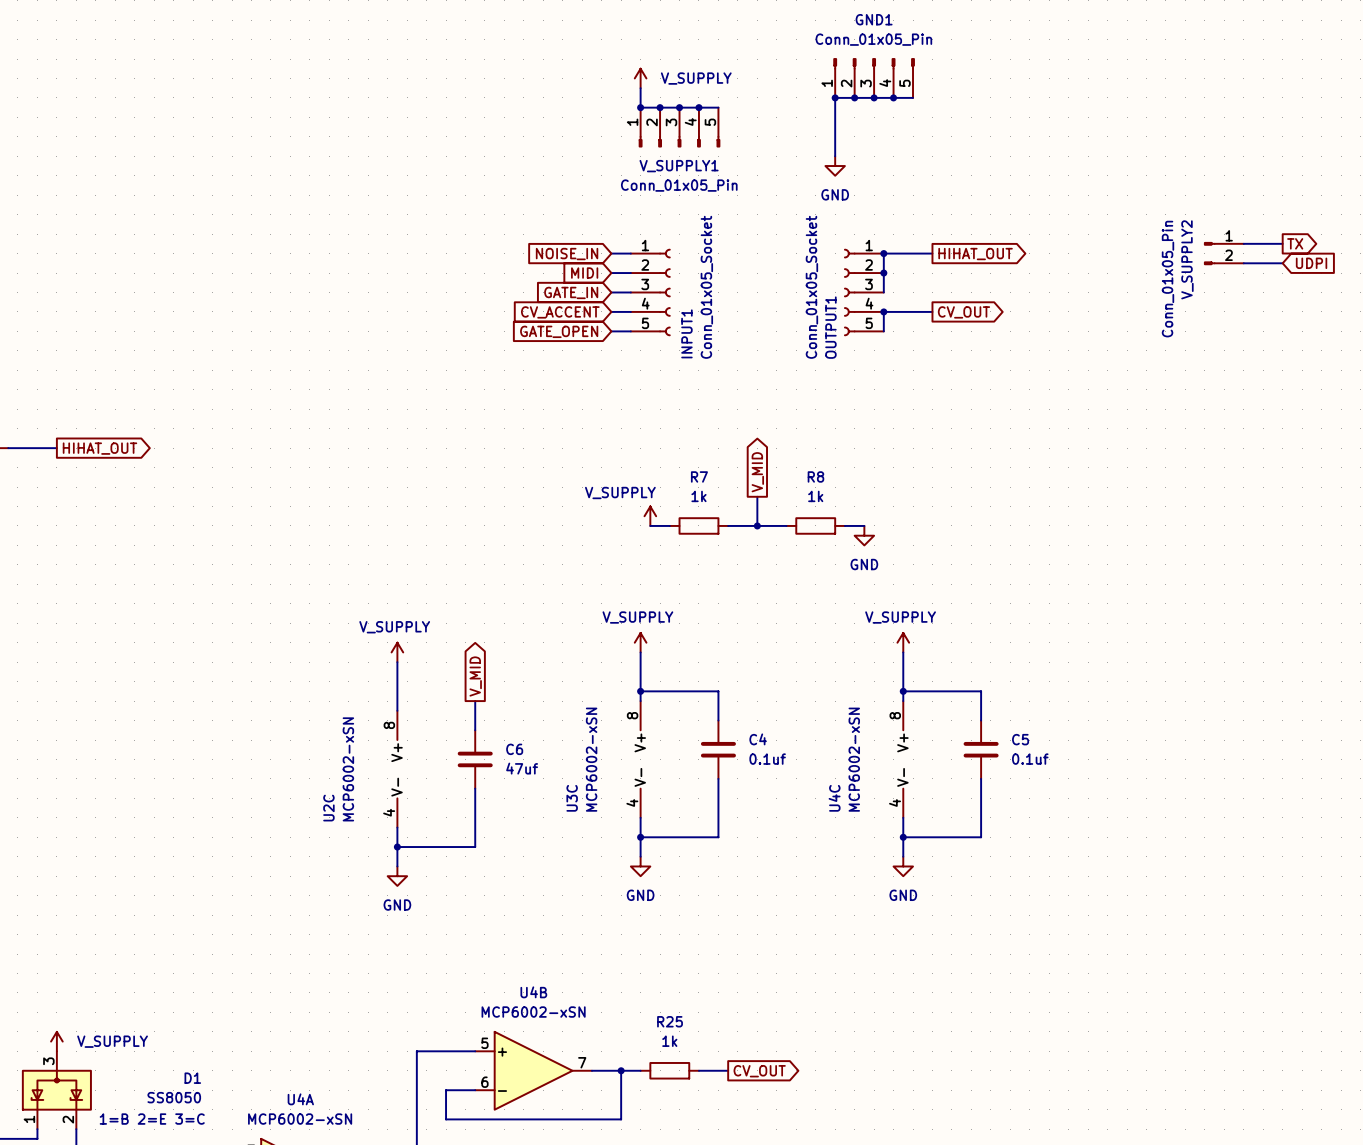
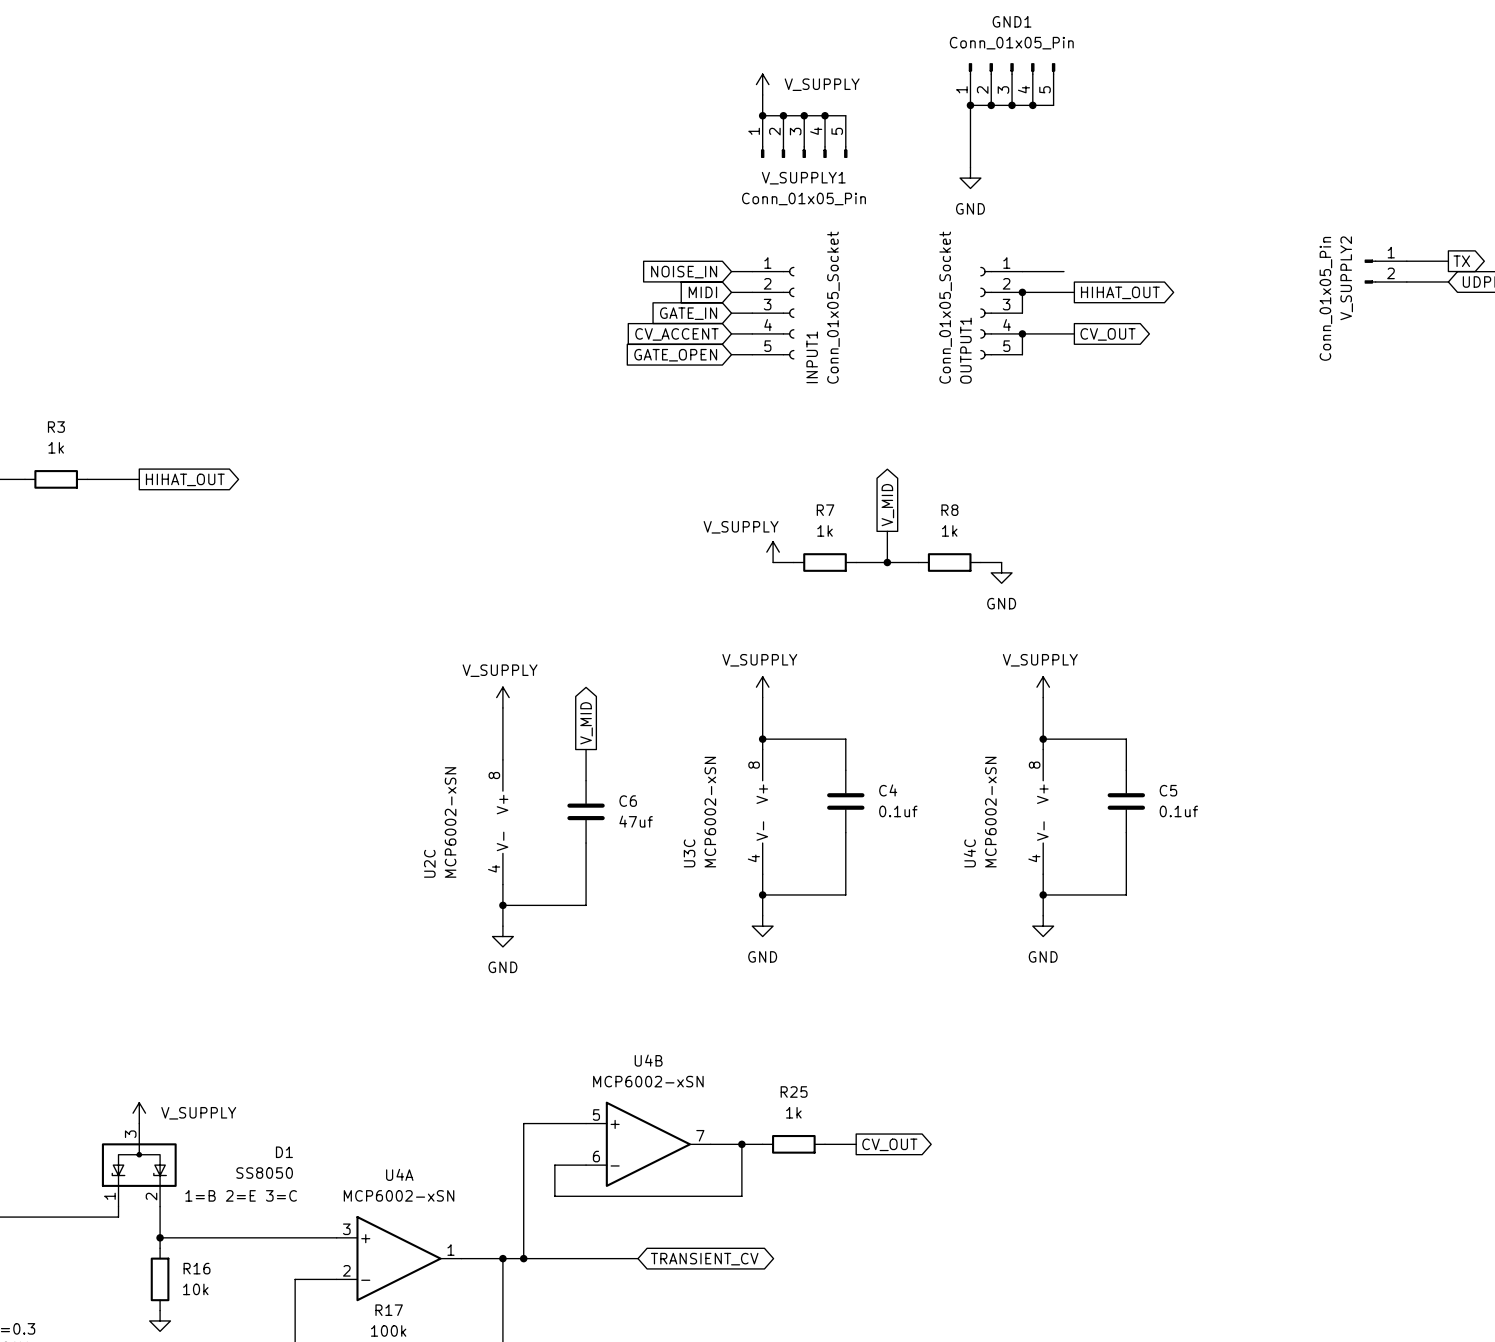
wire: (883, 253) (883, 273) -> (1074, 292) (1022, 292)
junction: (883, 253) -> none
wire: (922, 253) (932, 253) -> none
global label position: HIHAT_OUT (975, 254) -> HIHAT_OUT (1120, 292)

